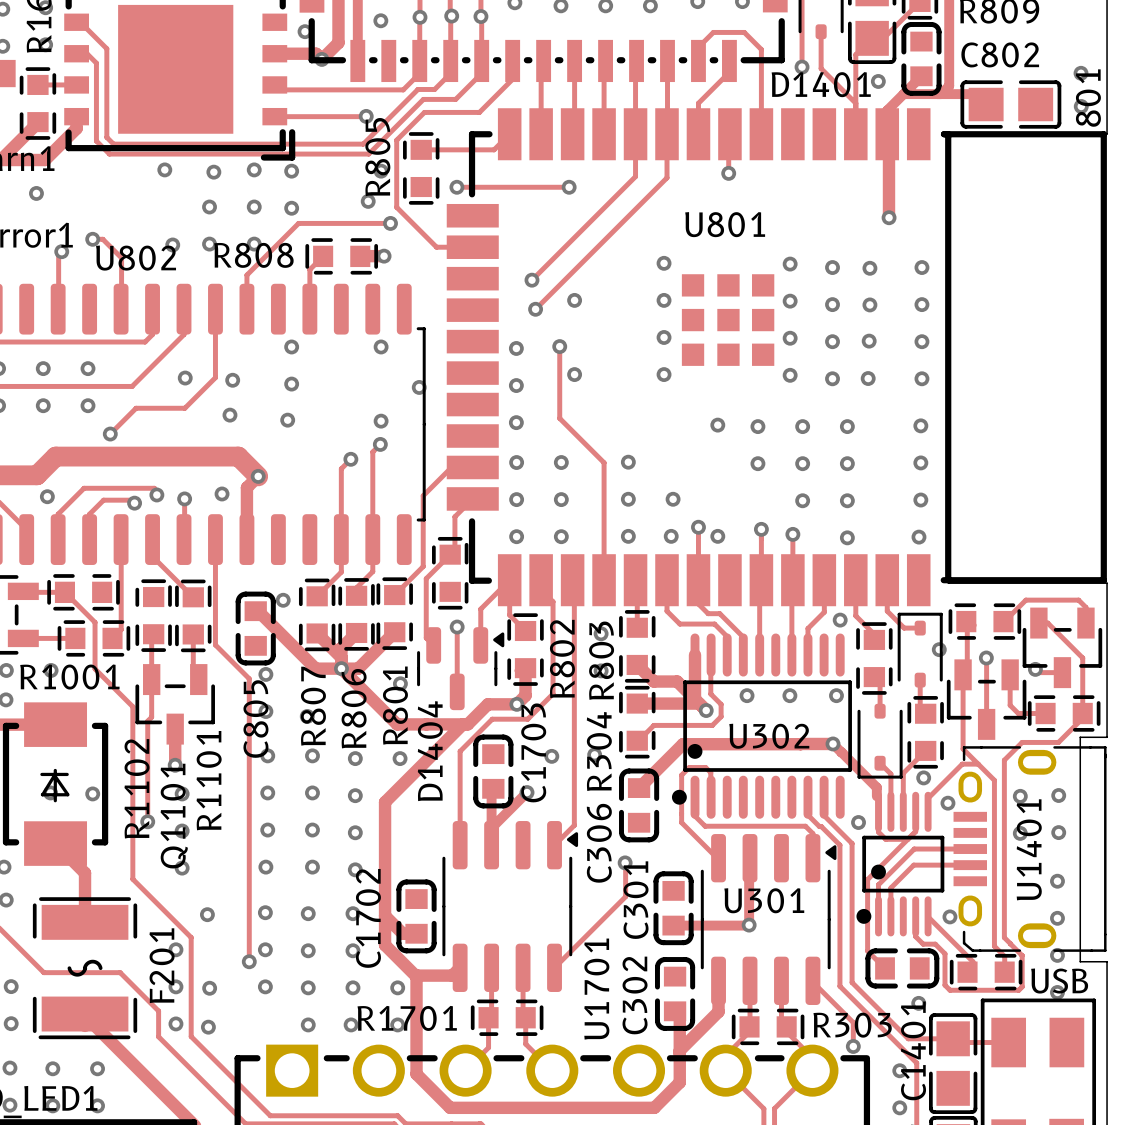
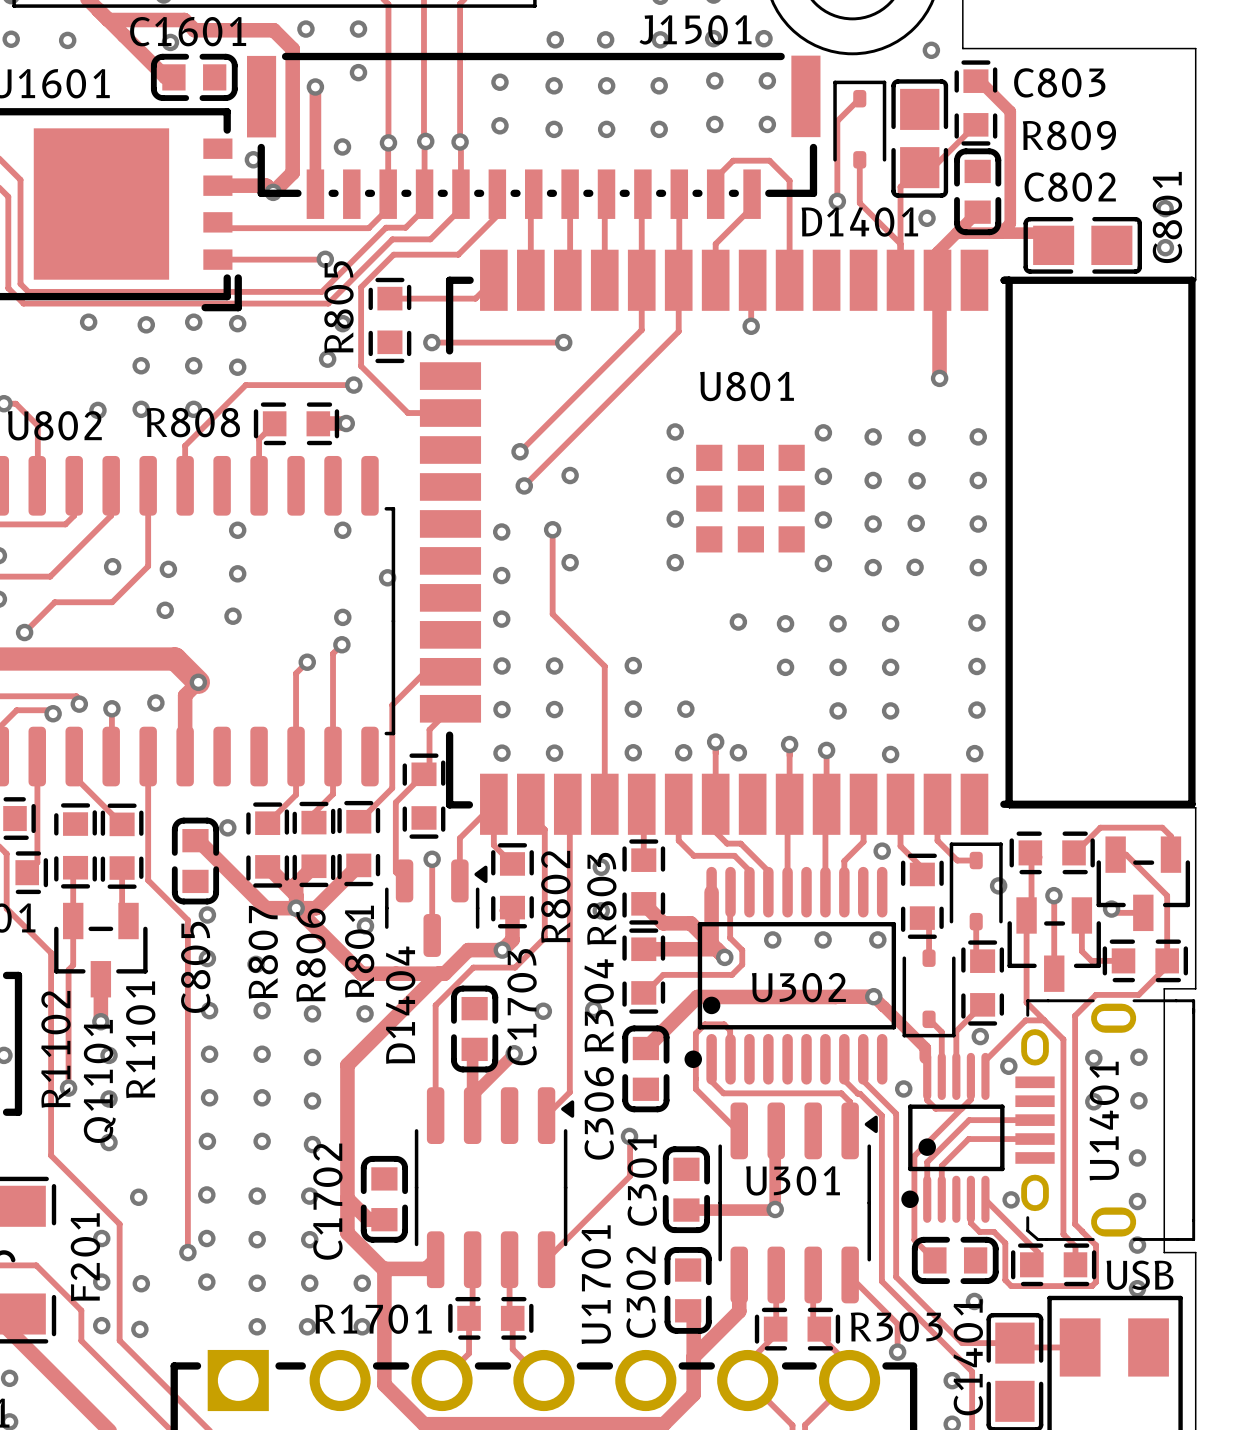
801 name: 801 (1088, 98) -> C801 (1167, 217)

